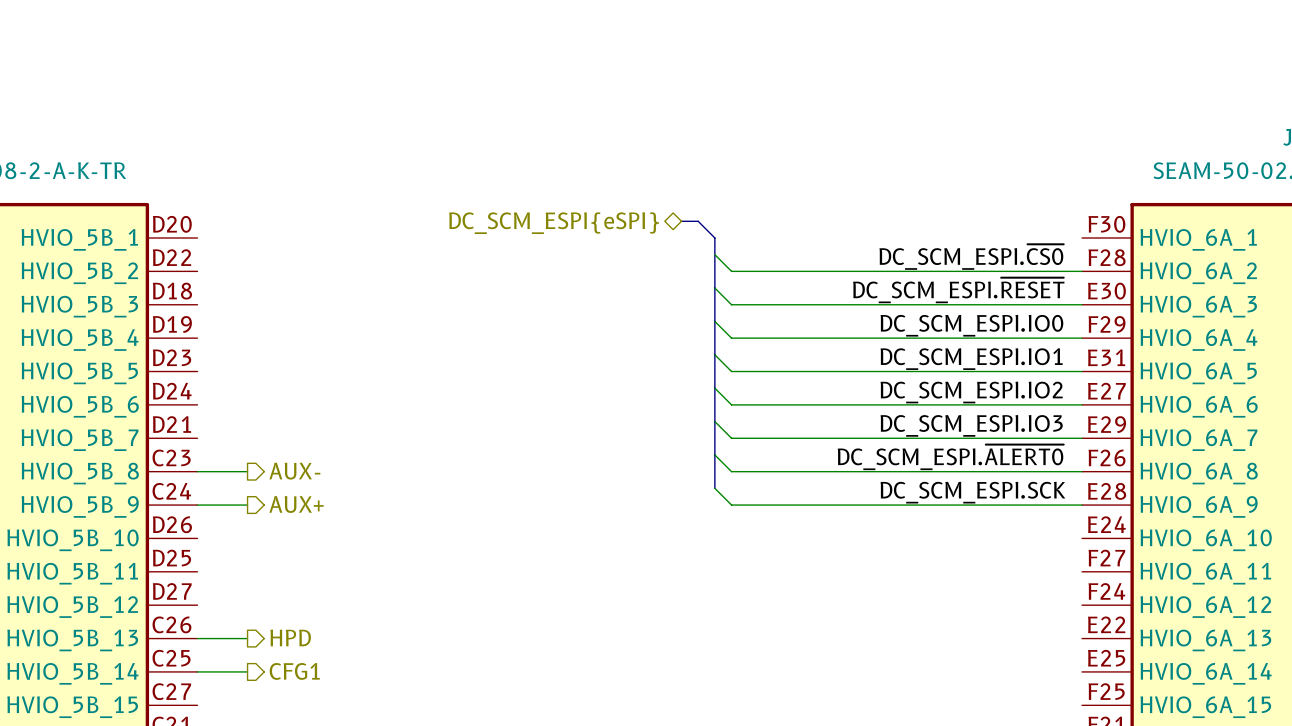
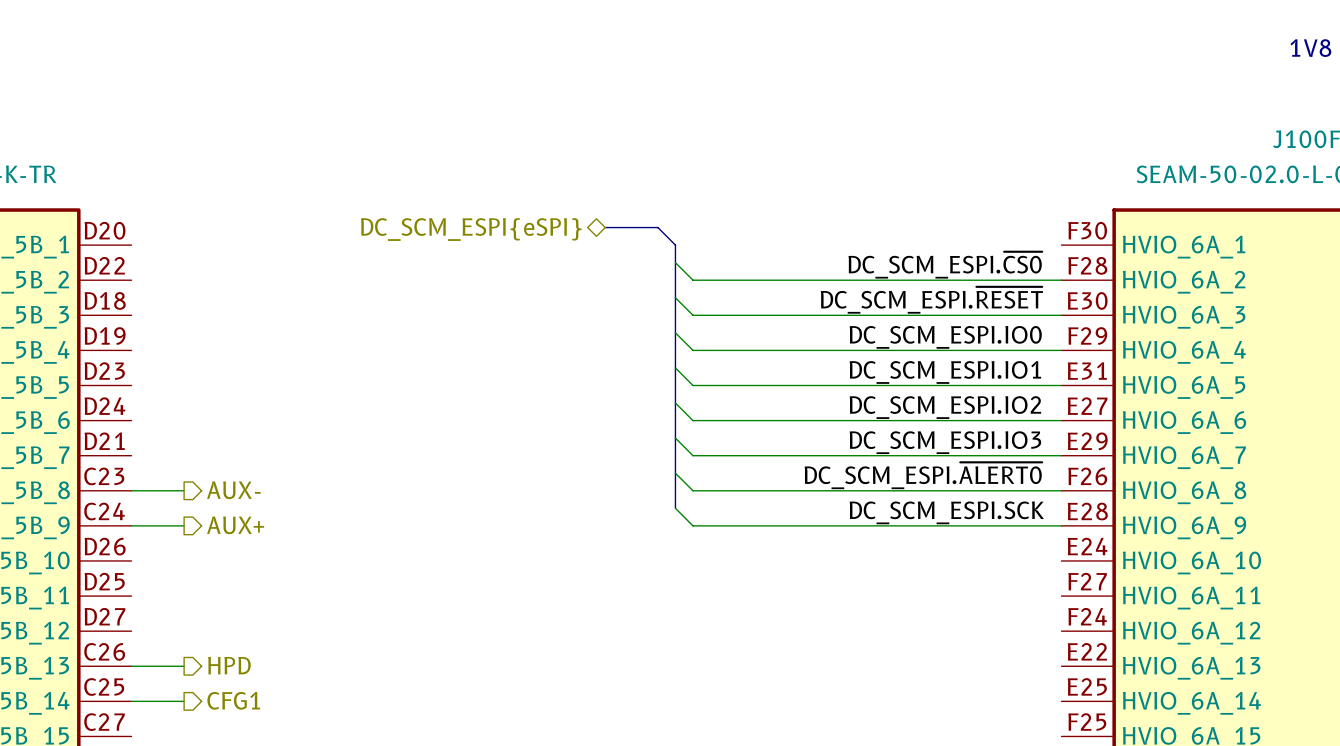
bus: none -> (605, 227) (640, 227)
hierarchical label position: DC_SCM_ESPI{eSPI} (554, 223) -> DC_SCM_ESPI{eSPI} (471, 229)

